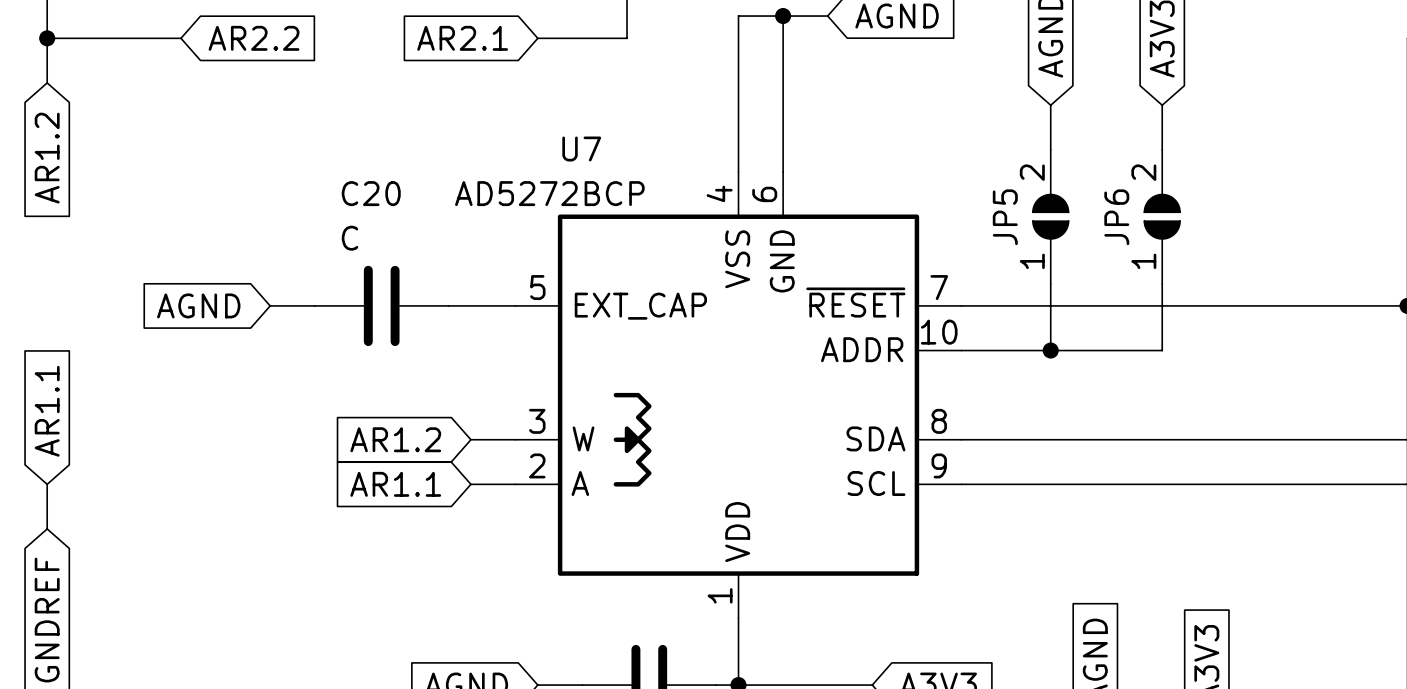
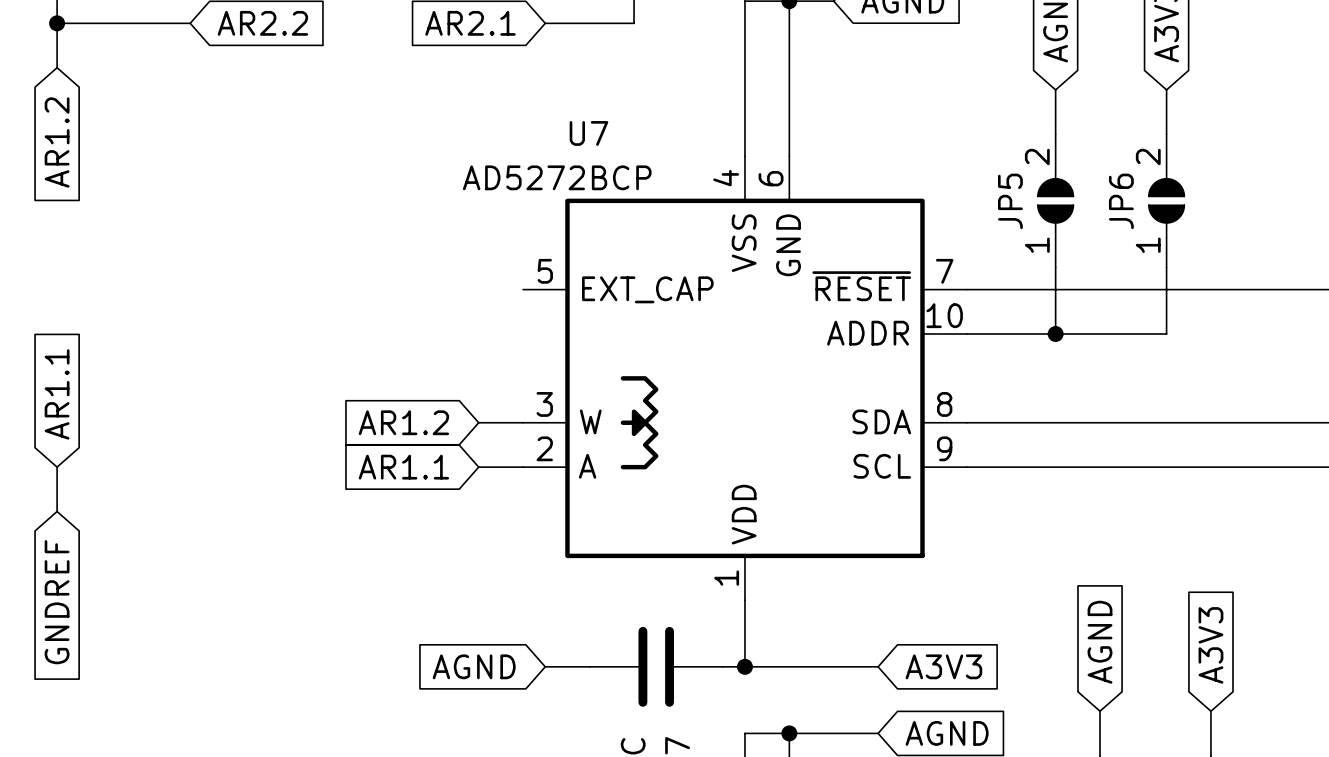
global label: AGND (198, 305) -> none
wire: (270, 305) (314, 305) -> none
C20: C (381, 305) -> none
wire: (448, 305) (515, 305) -> none

